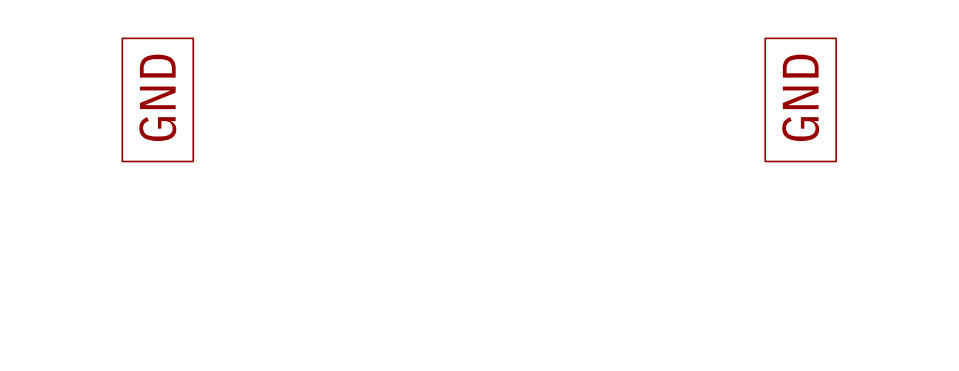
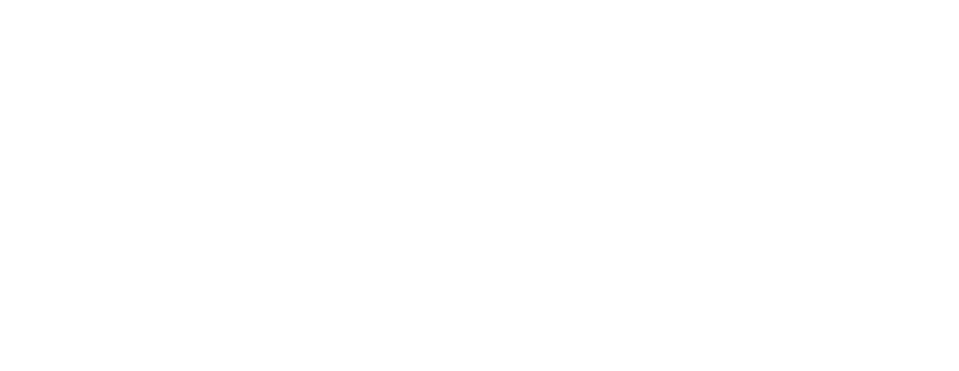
global label: GND (157, 97) -> none
global label: GND (800, 97) -> none

